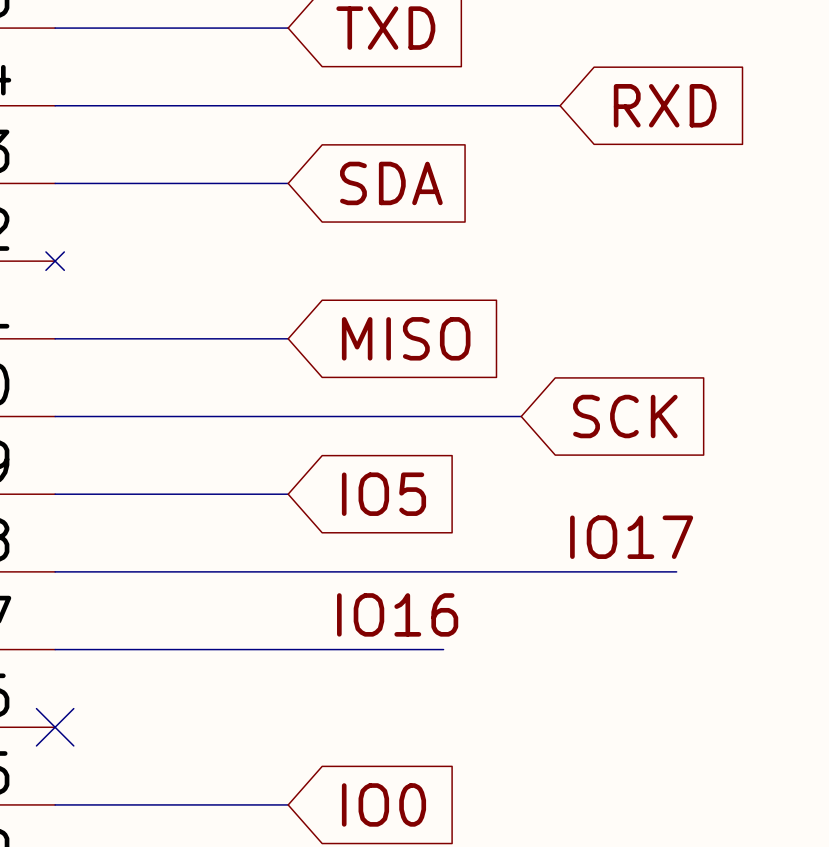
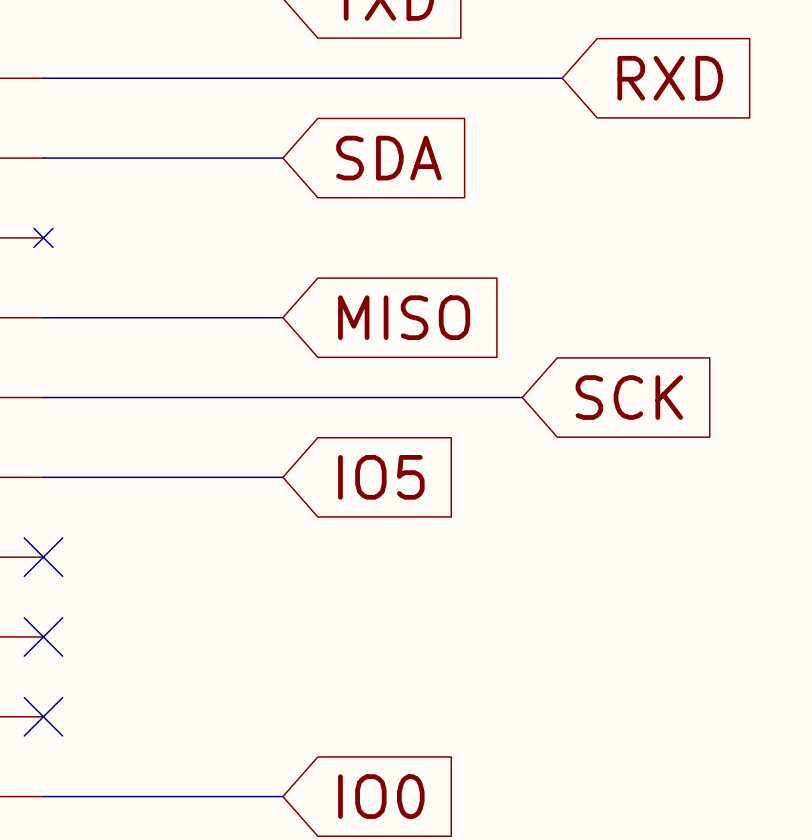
label: IO17 (631, 537) -> none
wire: (55, 571) (676, 571) -> none
no-connect mark: none -> (43, 557)
label: IO16 (397, 614) -> none
wire: (55, 649) (443, 649) -> none
no-connect mark: none -> (43, 636)

